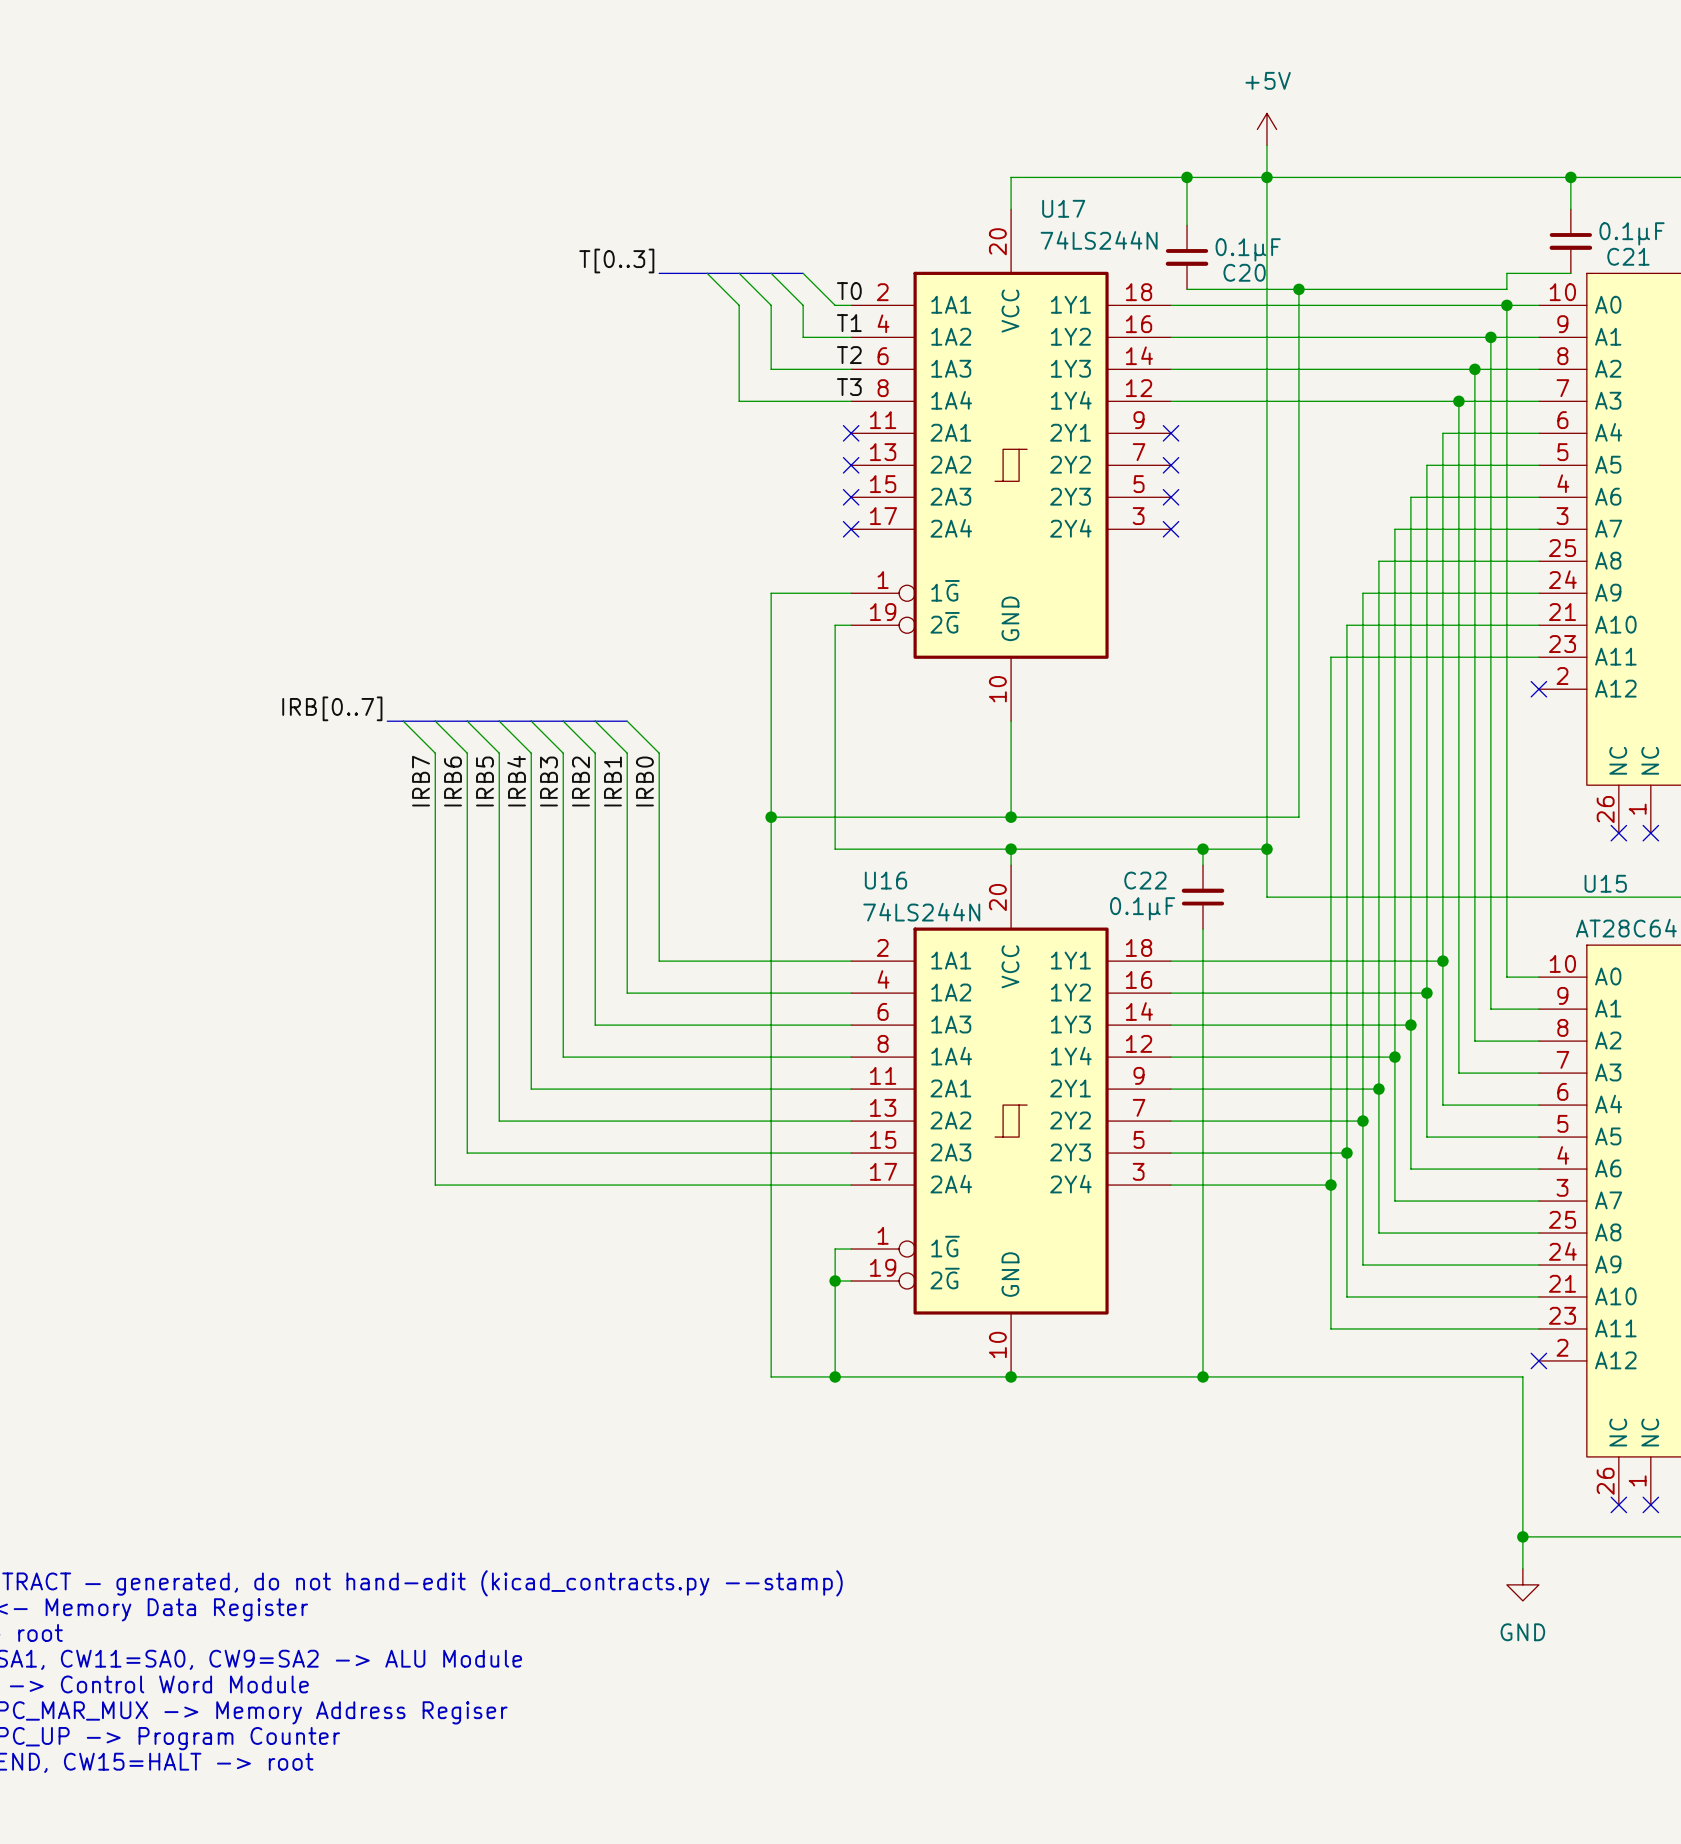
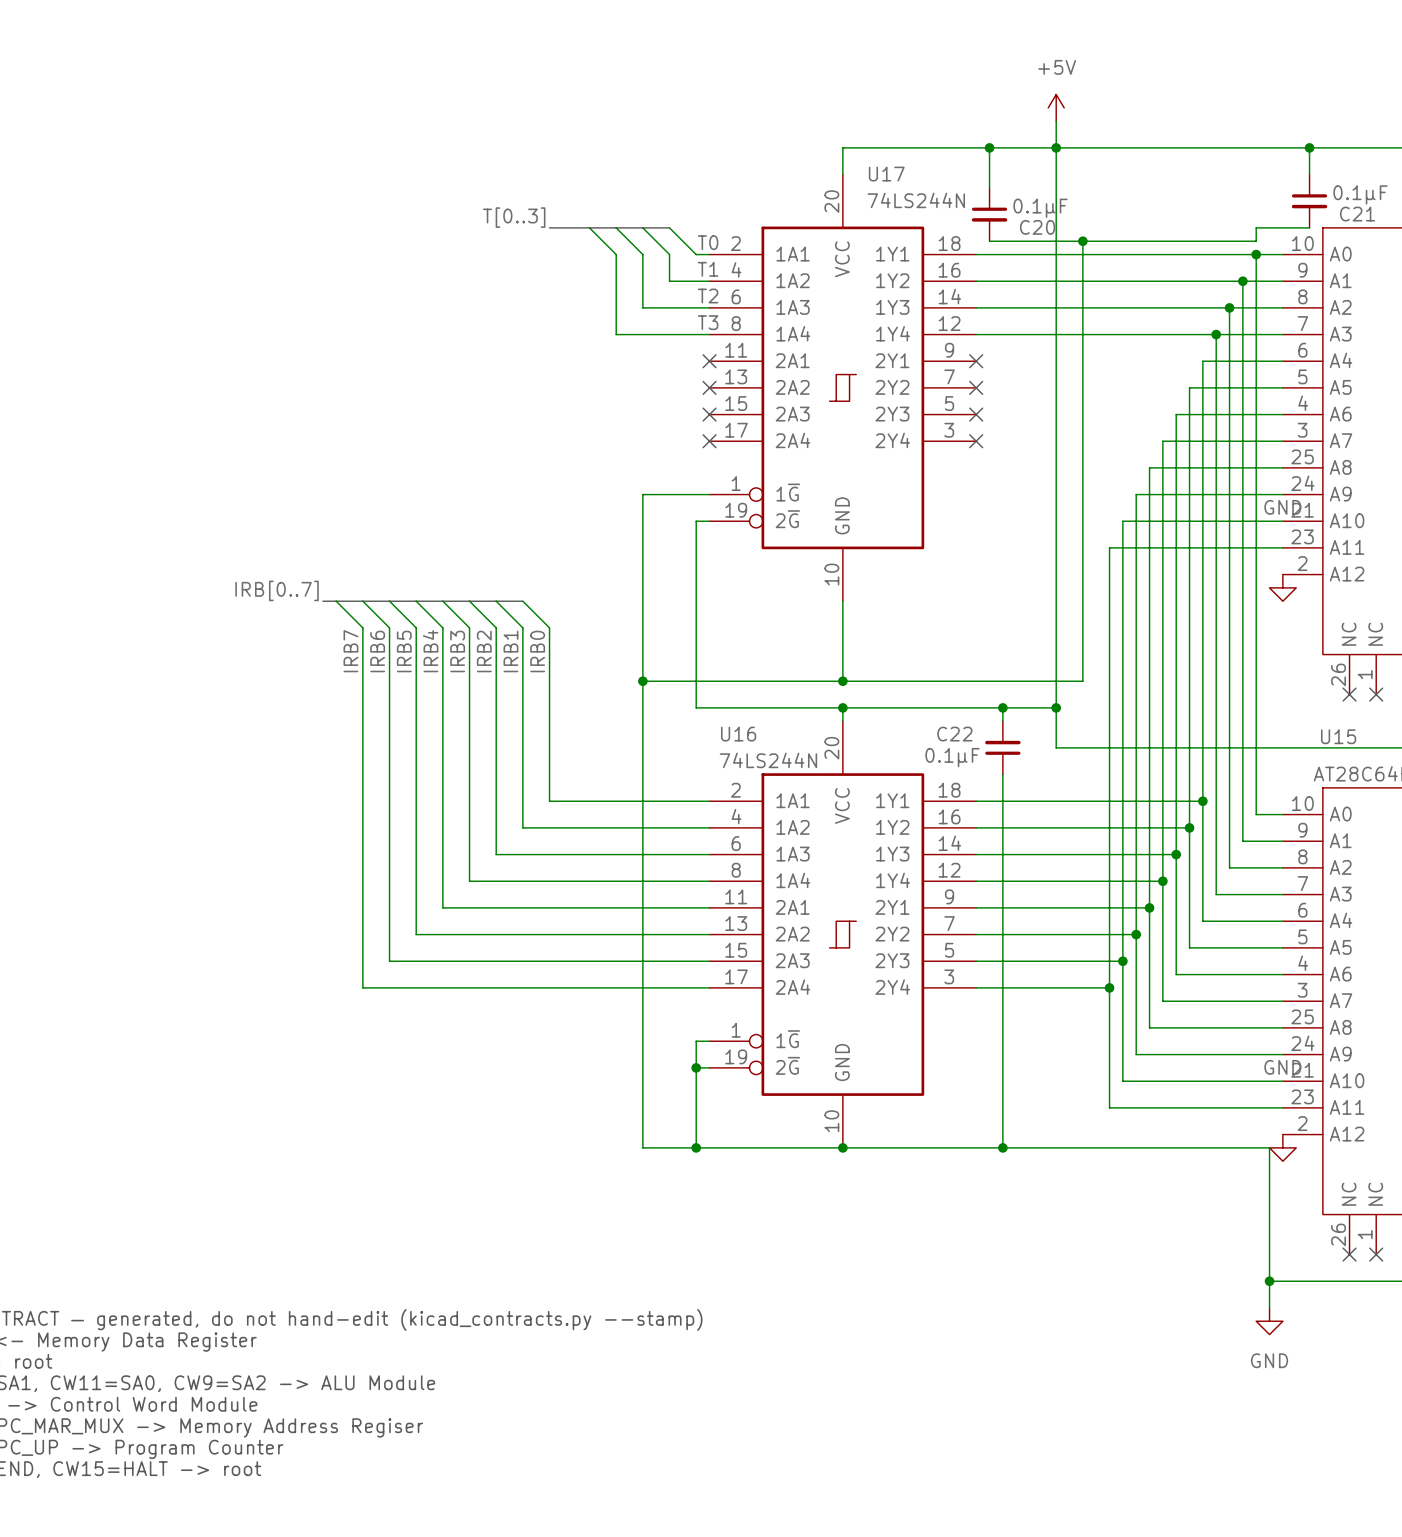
no-connect mark: (1538, 689) -> none
power symbol: none -> GND (1282, 587)
no-connect mark: (1538, 1360) -> none
power symbol: none -> GND (1282, 1147)

